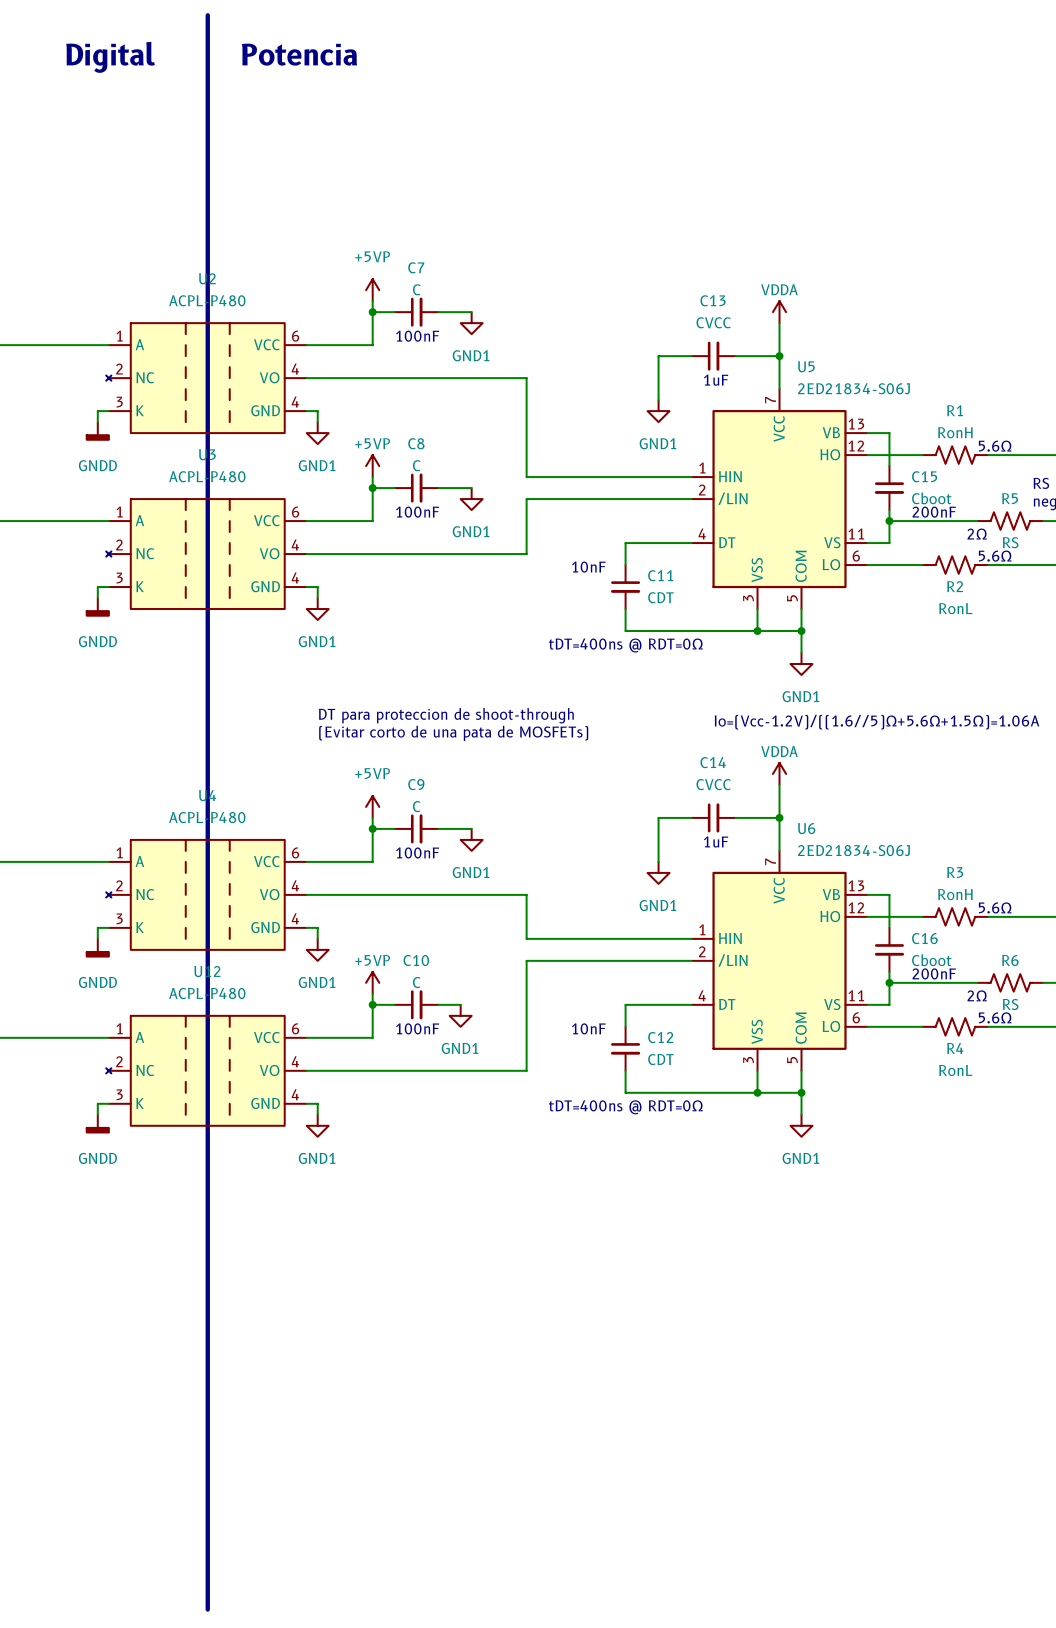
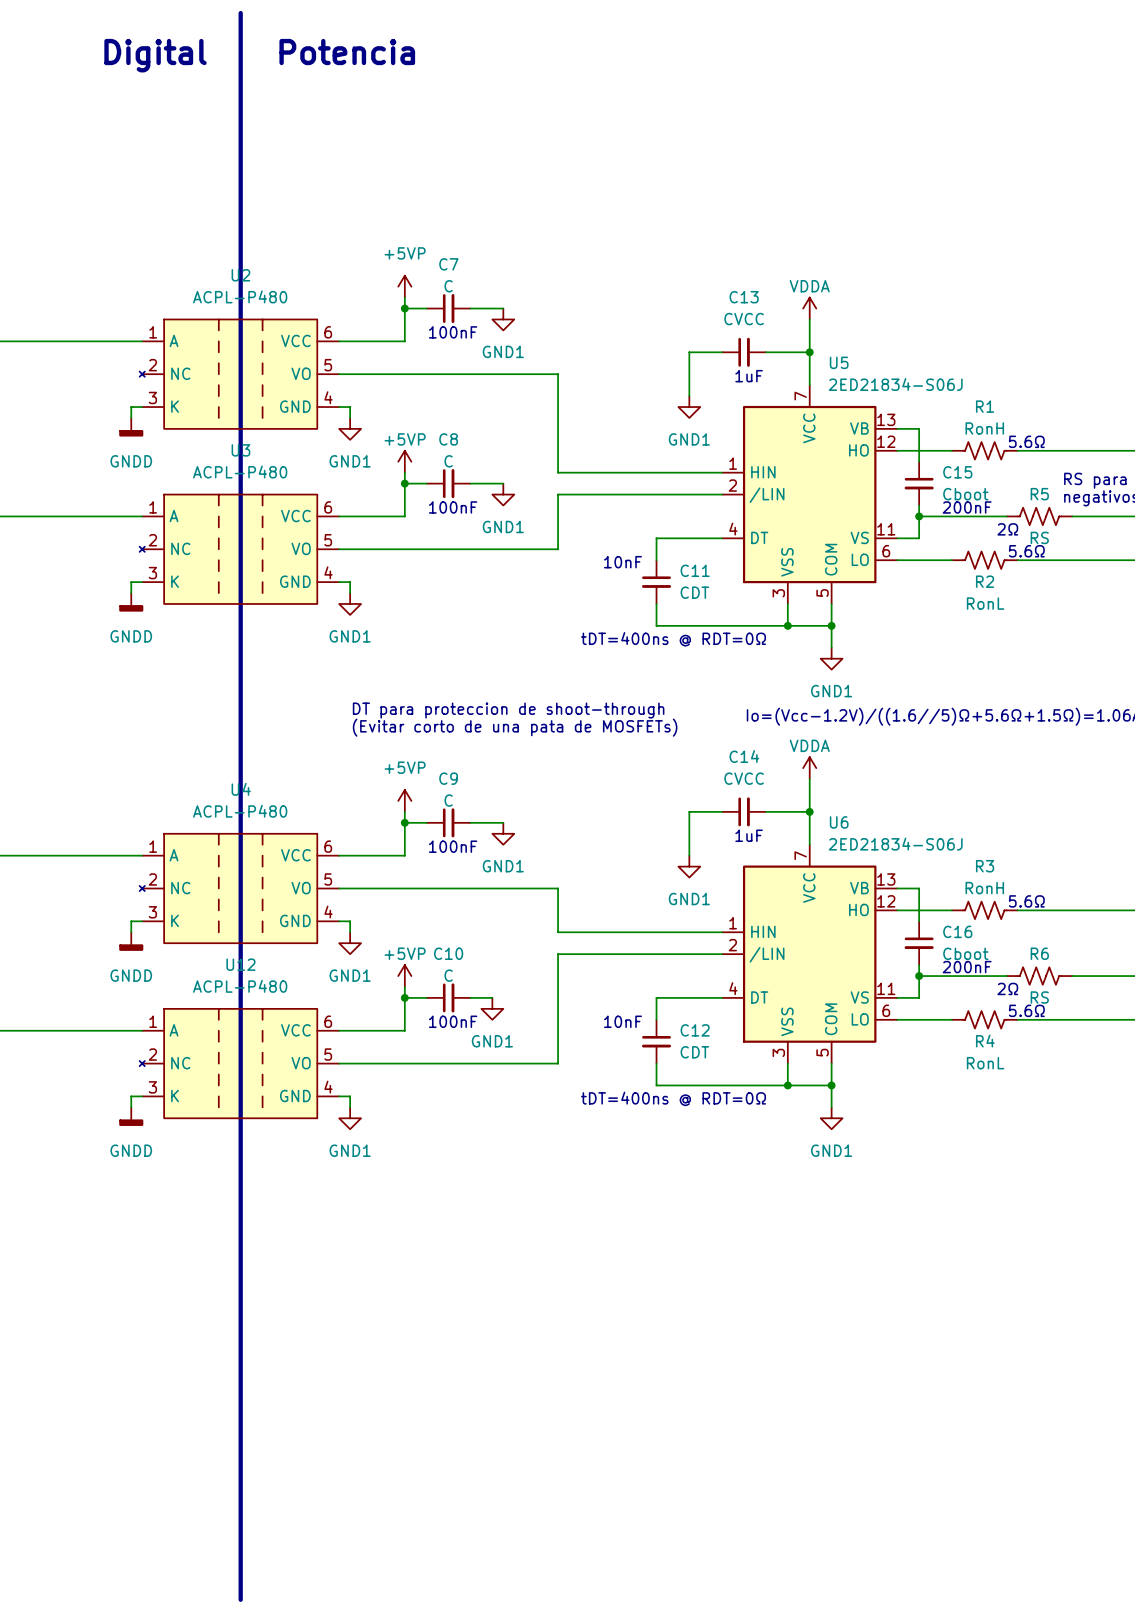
U2 pin number: 4 (295, 369) -> 5 (328, 365)
U3 pin number: 4 (295, 544) -> 5 (328, 540)
U4 pin number: 4 (295, 885) -> 5 (328, 879)
U12 pin number: 4 (295, 1061) -> 5 (328, 1054)

